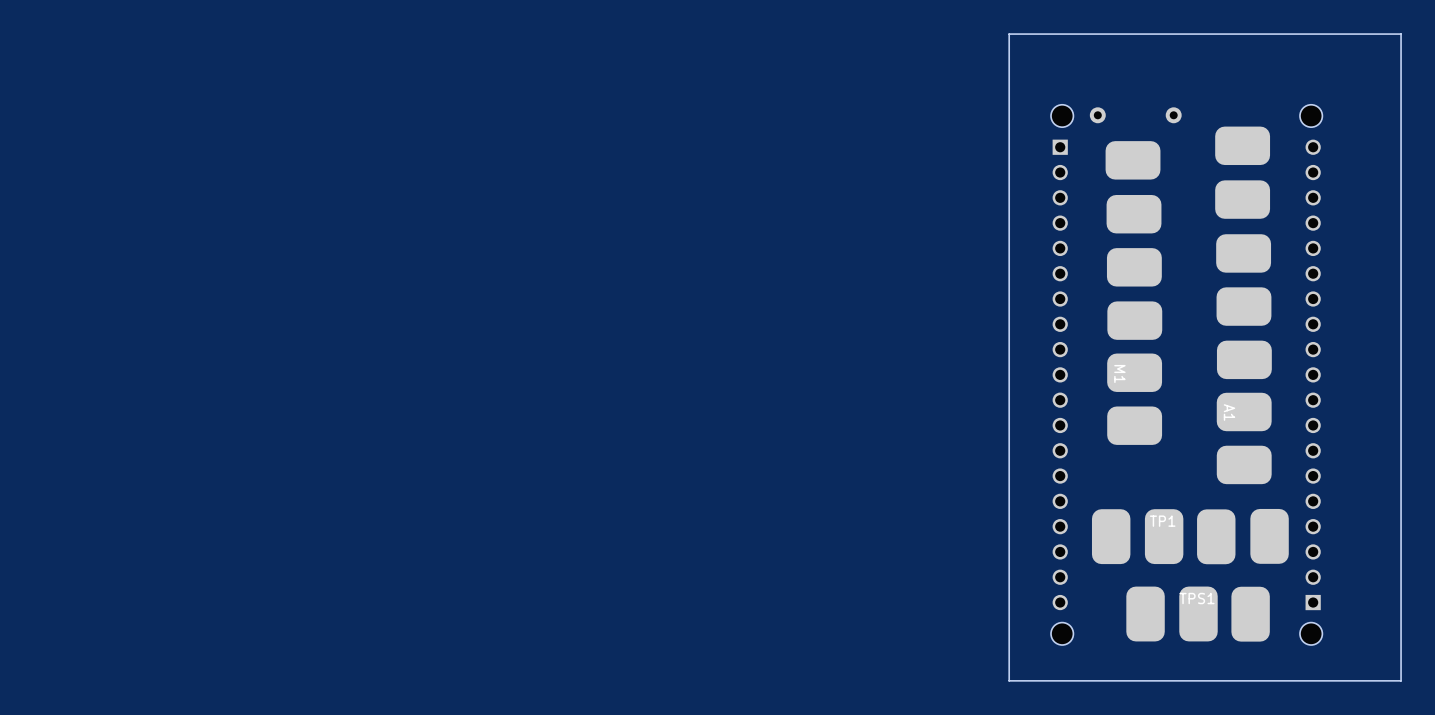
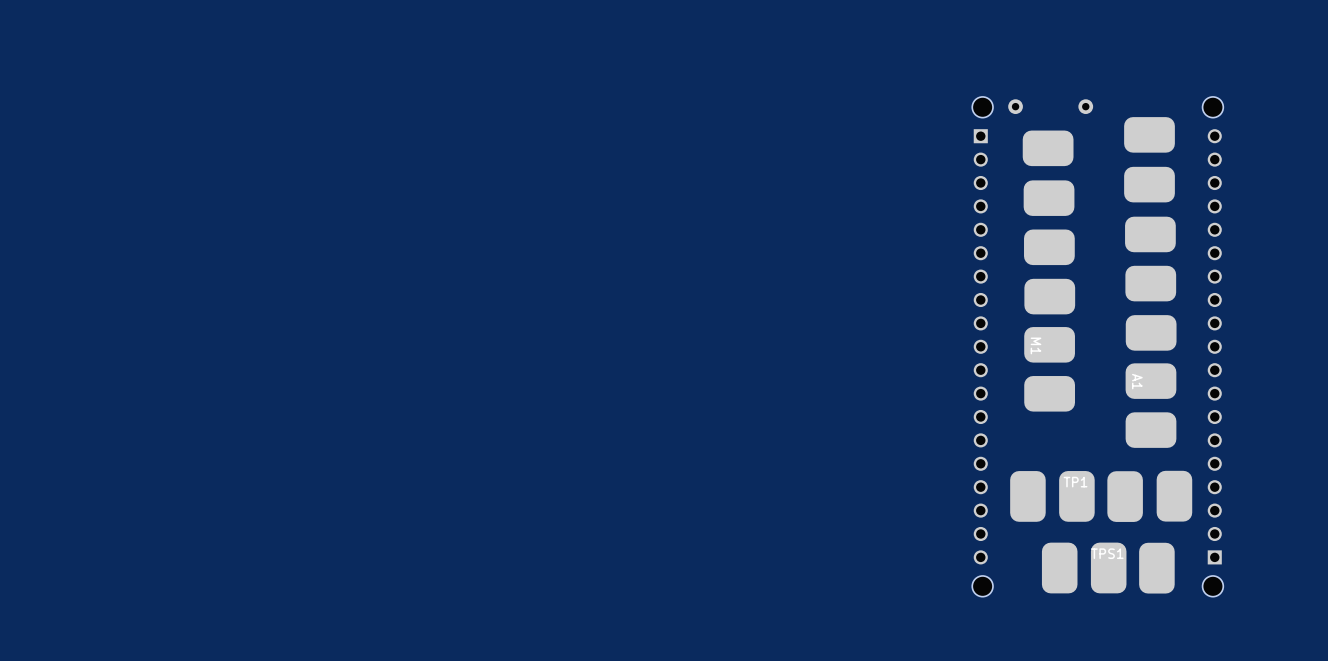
board edge: (1401, 34) (1009, 34) (1009, 680) (1401, 680) (1401, 34) -> none

